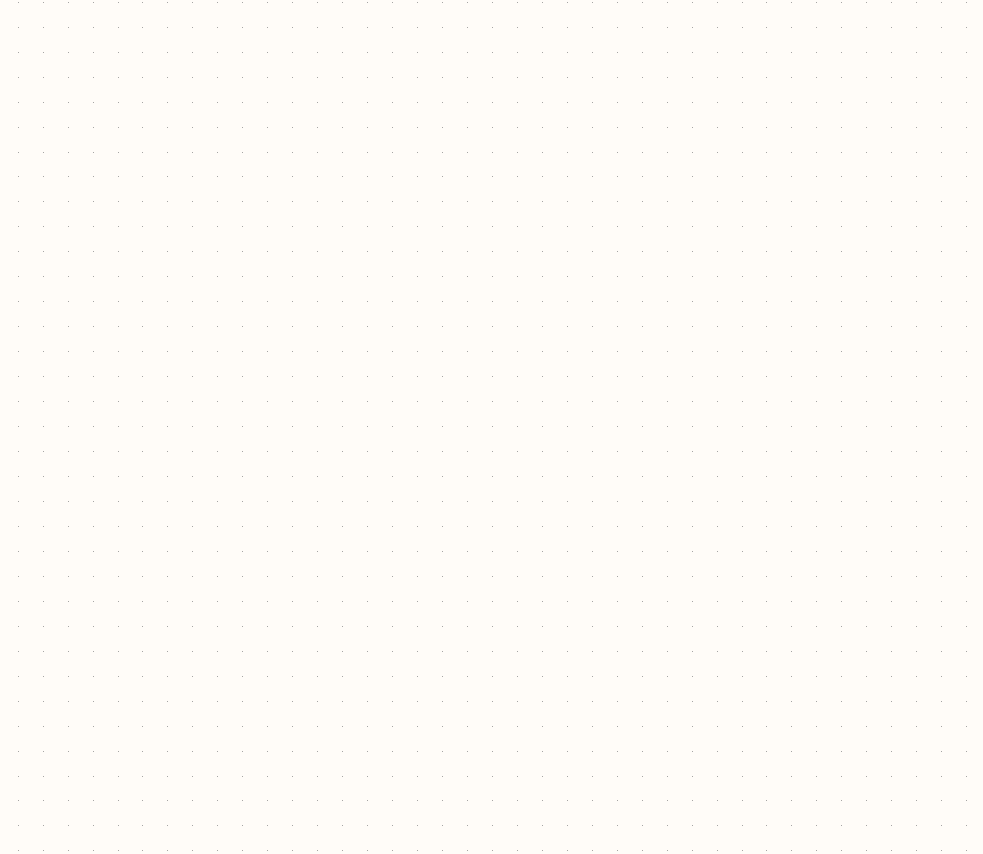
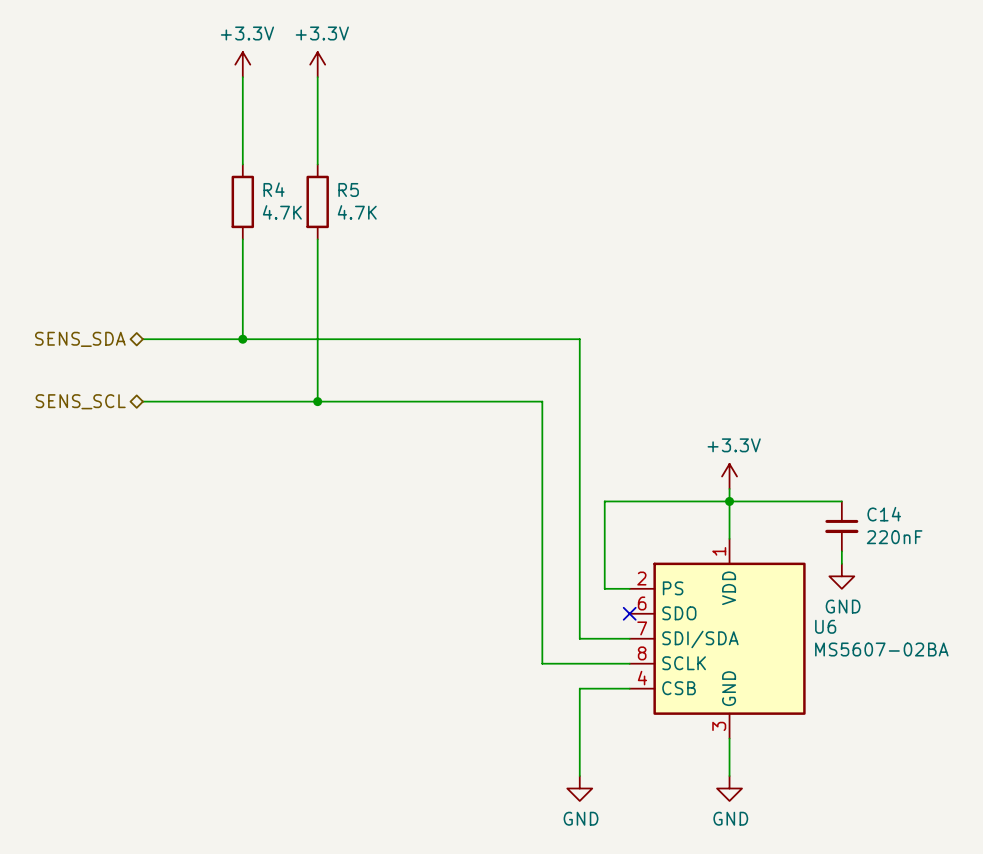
power symbol: none -> +3.3V (242, 64)
power symbol: none -> +3.3V (317, 64)
wire: none -> (242, 77) (242, 164)
wire: none -> (317, 77) (317, 164)
R4: none -> 4.7K (242, 201)
R5: none -> 4.7K (317, 201)
wire: none -> (242, 239) (242, 339)
wire: none -> (317, 239) (317, 401)
hierarchical label: none -> SENS_SDA (80, 339)
wire: none -> (142, 339) (579, 339) (579, 638) (629, 638)
junction: none -> (242, 339)
hierarchical label: none -> SENS_SCL (80, 401)
wire: none -> (142, 401) (542, 401) (542, 663) (629, 663)
junction: none -> (317, 401)
power symbol: none -> +3.3V (729, 476)
wire: none -> (729, 488) (729, 538)
junction: none -> (729, 501)
wire: none -> (841, 501) (604, 501) (604, 588) (629, 588)
C14: none -> 220nF (841, 526)
wire: none -> (841, 551) (841, 563)
power symbol: none -> GND (841, 576)
no-connect mark: none -> (629, 613)
U6: none -> MS5607-02BA (717, 638)
wire: none -> (629, 688) (579, 688) (579, 776)
wire: none -> (729, 738) (729, 776)
power symbol: none -> GND (579, 788)
power symbol: none -> GND (729, 788)

